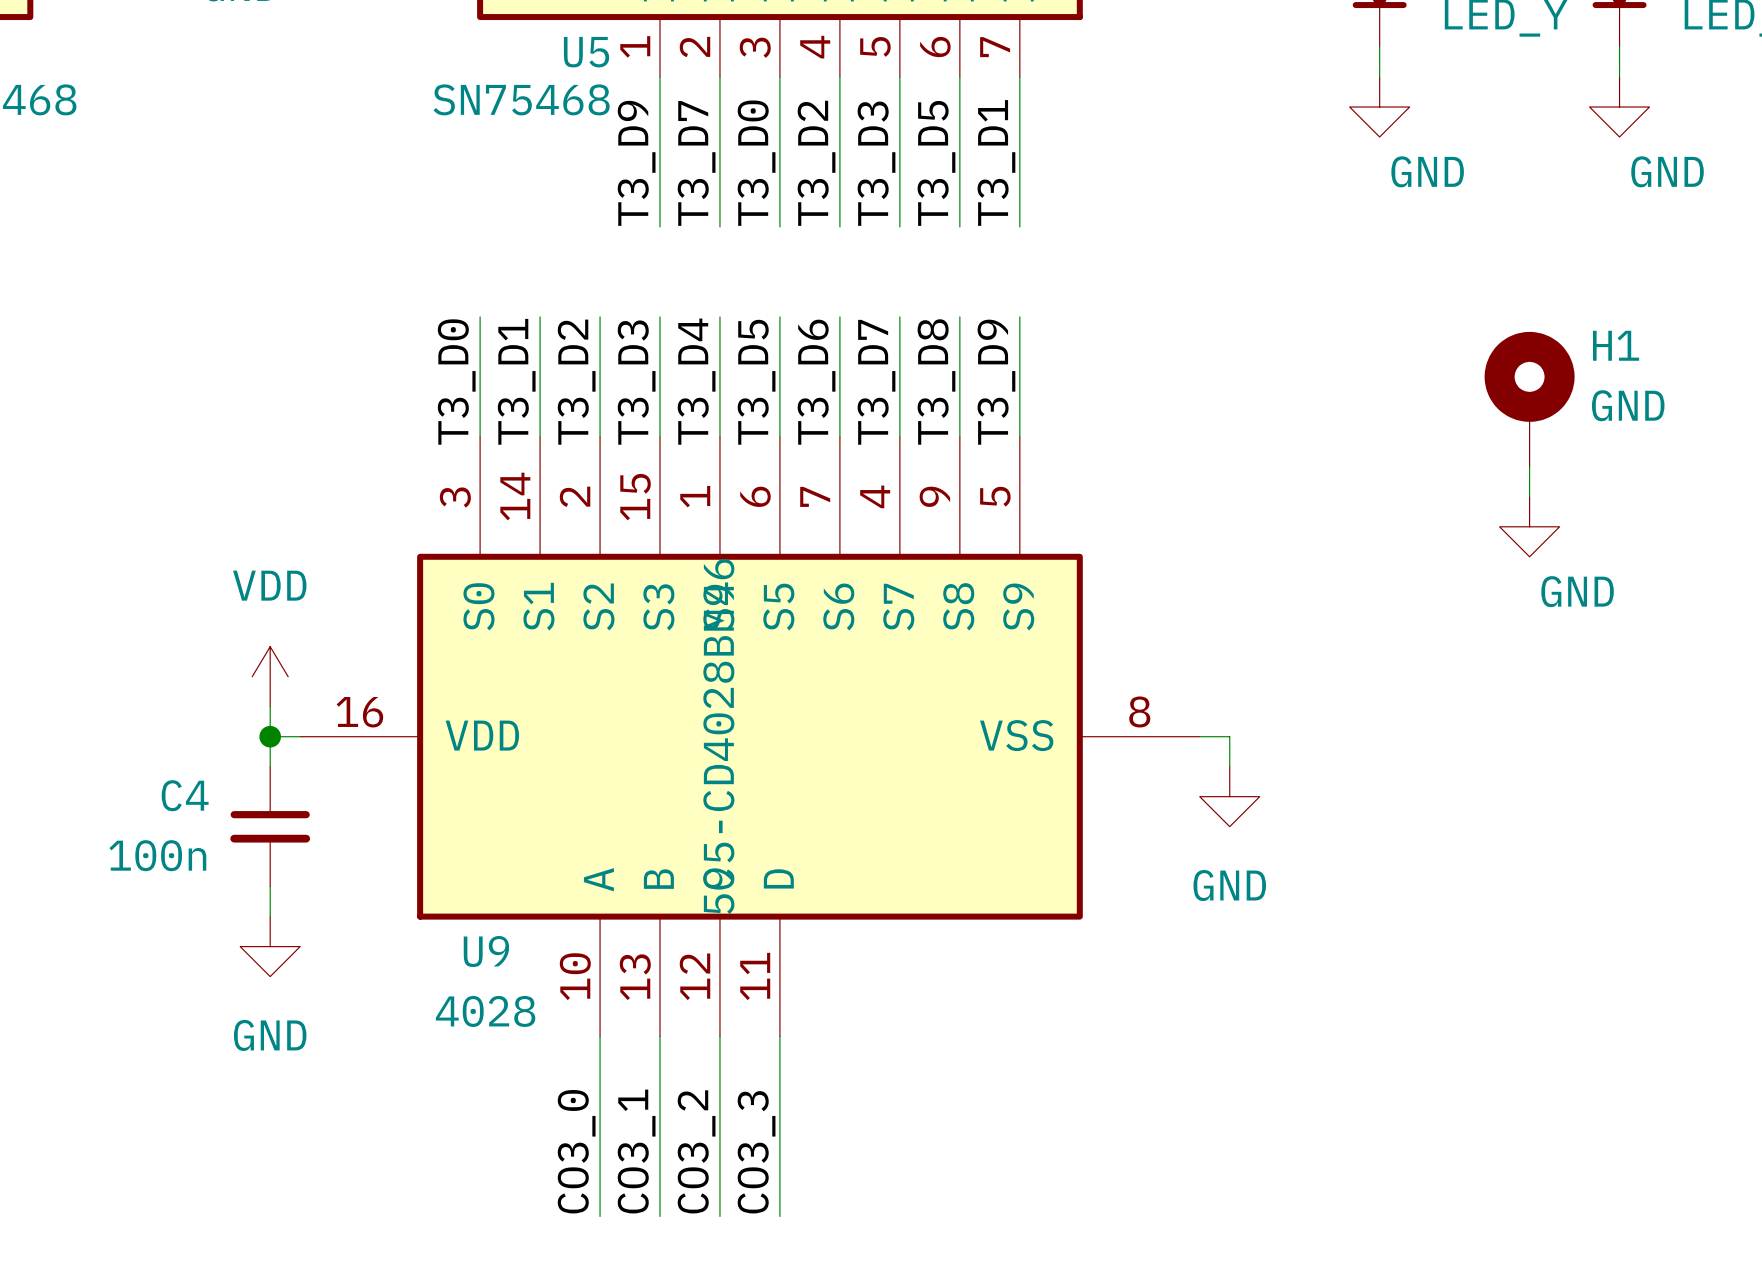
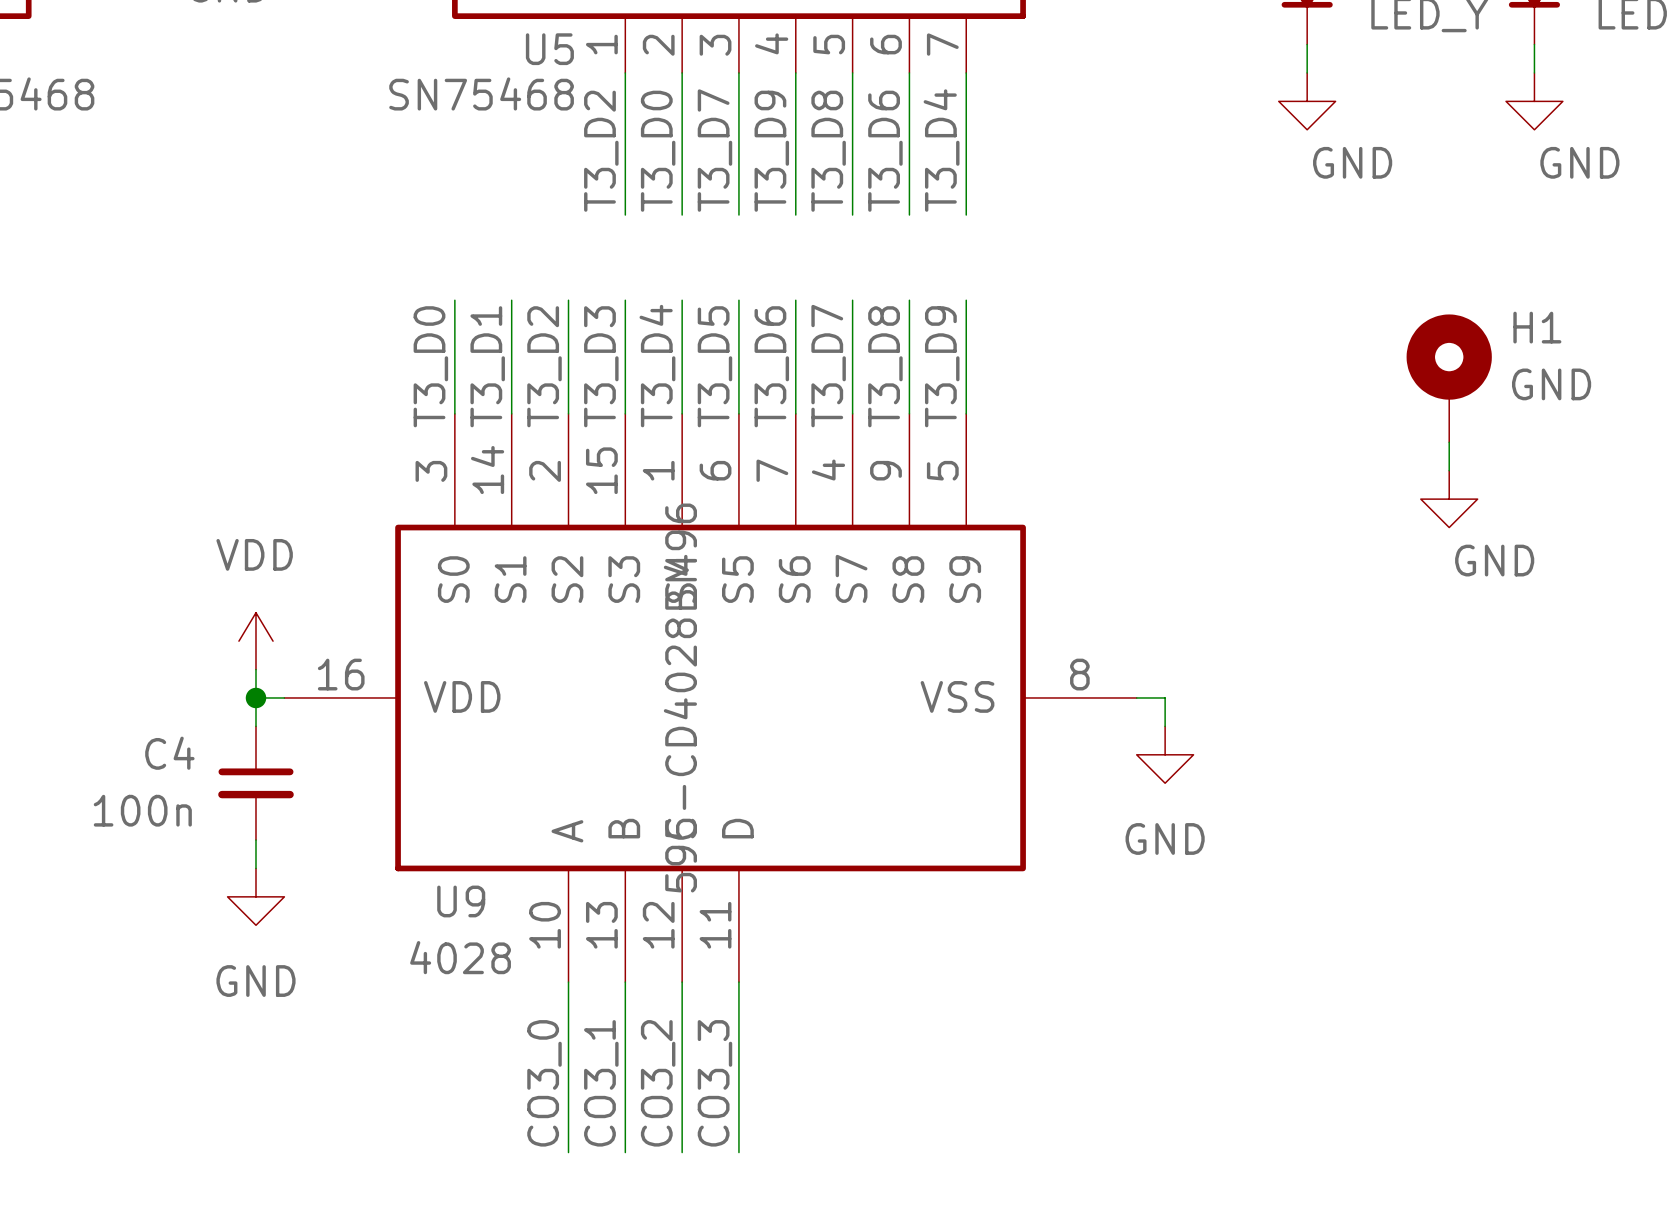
label: T3_D1 (996, 162) -> T3_D4 (941, 150)
label: T3_D9 (636, 163) -> T3_D2 (601, 151)
label: T3_D7 (696, 163) -> T3_D0 (658, 151)
label: T3_D0 (756, 163) -> T3_D7 (714, 150)
label: T3_D2 (816, 163) -> T3_D9 (771, 151)
label: T3_D3 (876, 163) -> T3_D8 (828, 151)
label: T3_D5 (936, 163) -> T3_D6 (885, 151)

